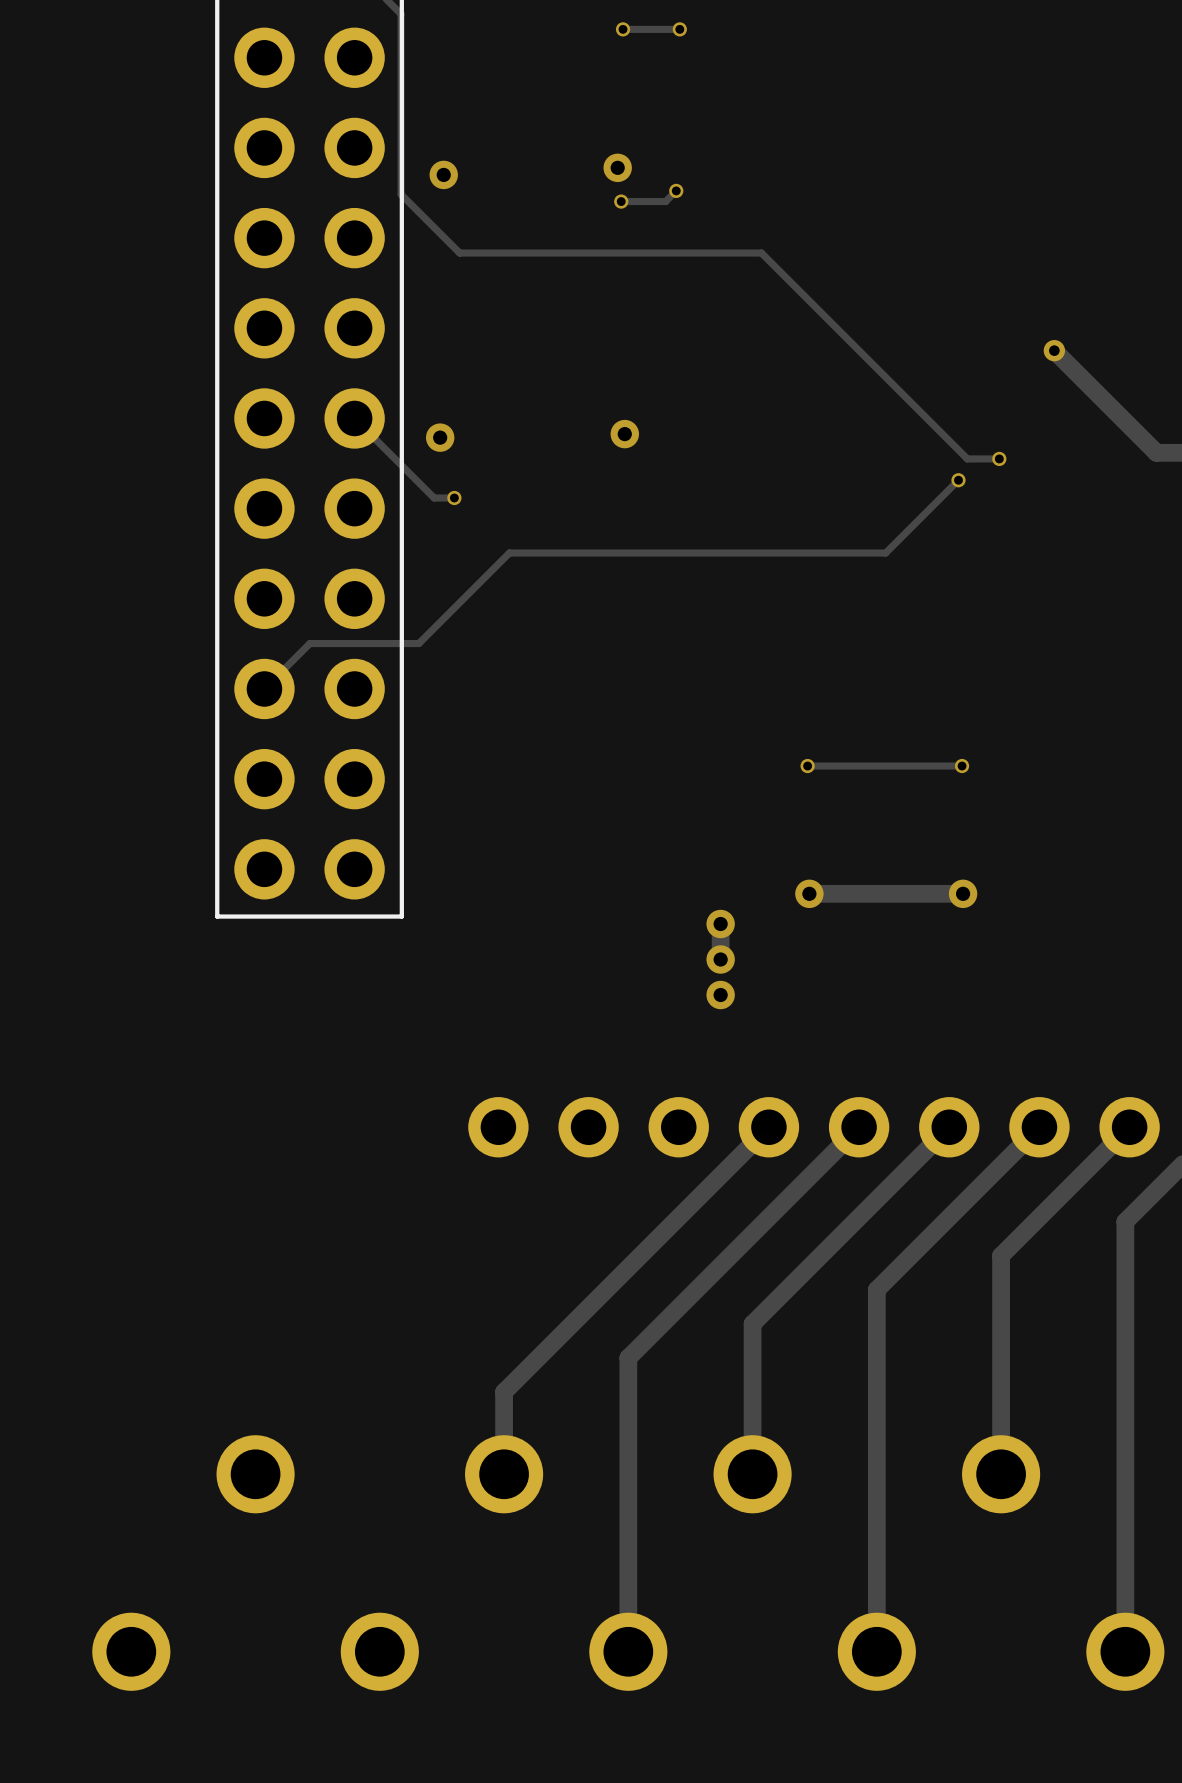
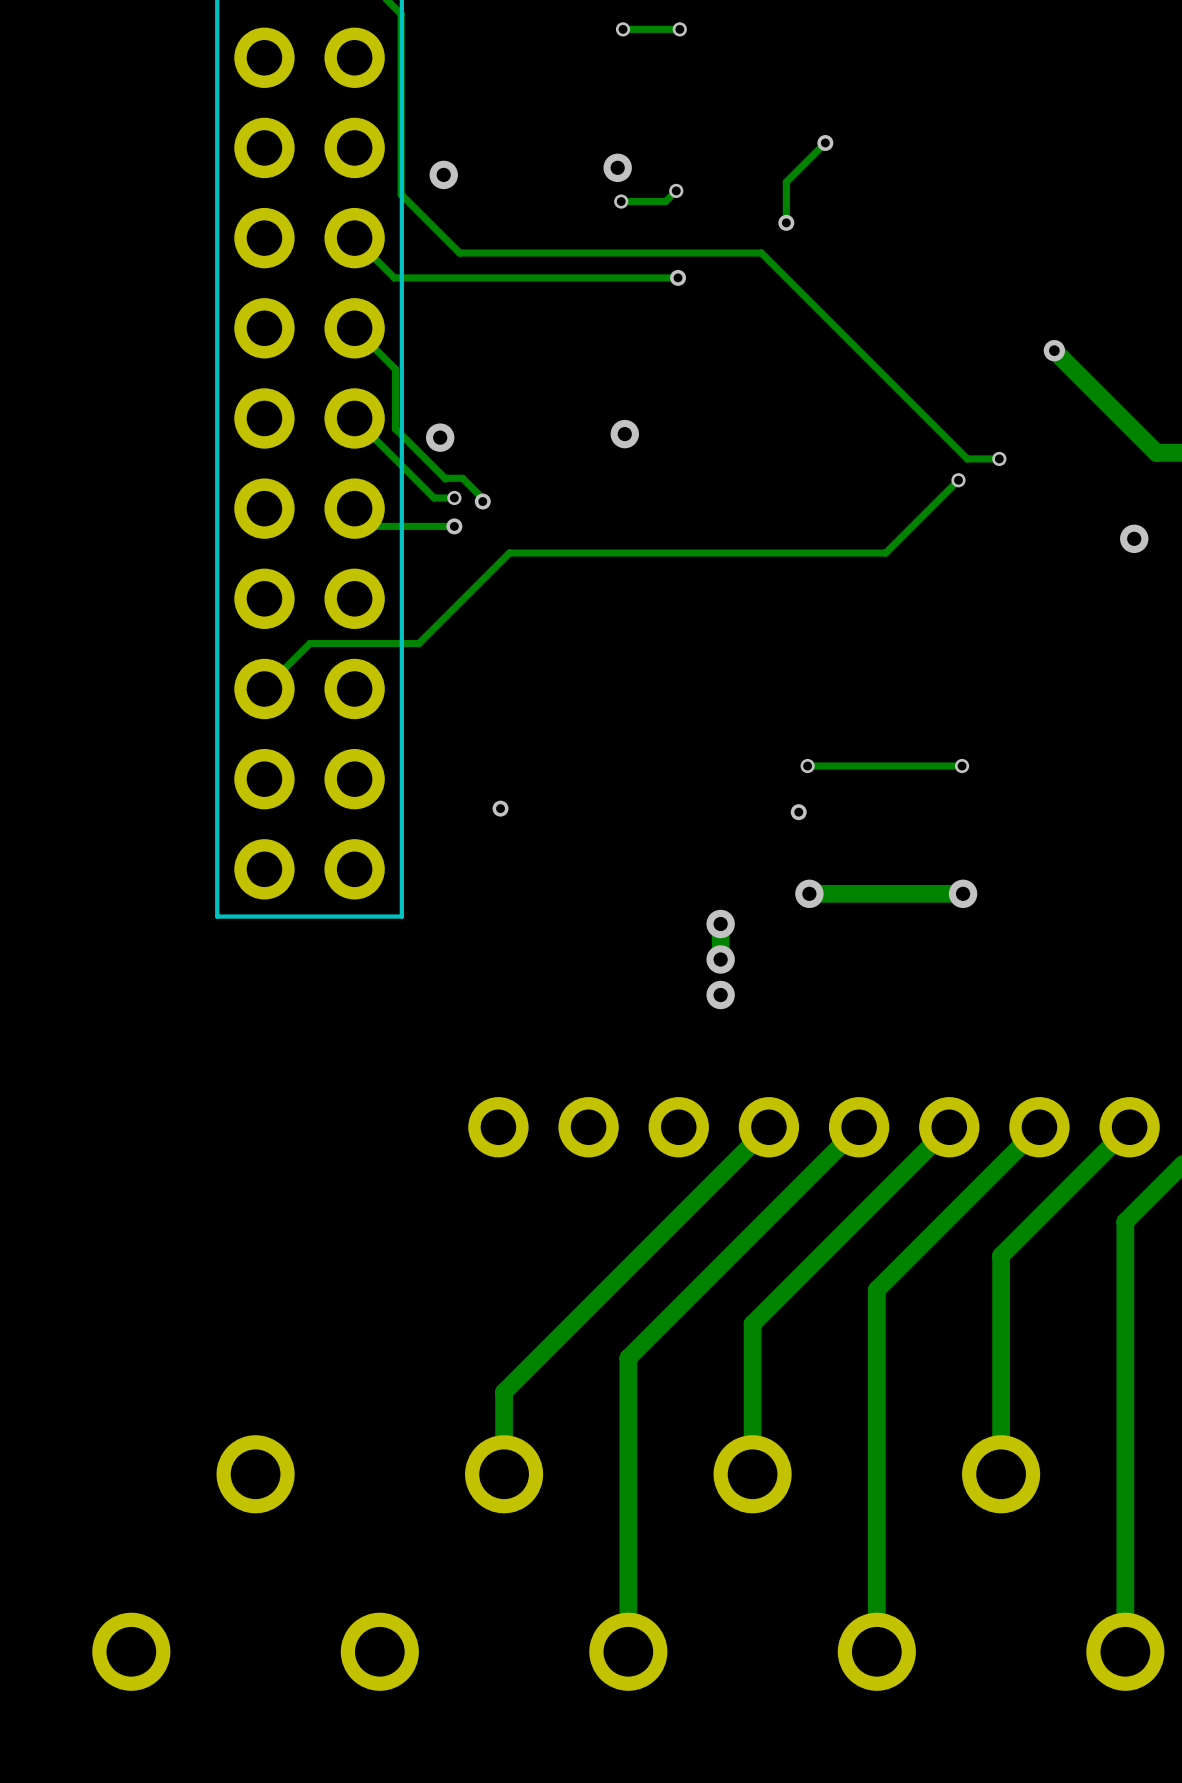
track: none -> (825, 142) (786, 182) (786, 222)
via: none -> (825, 142)
via: none -> (786, 222)
track: none -> (354, 238) (394, 277) (678, 277)
via: none -> (678, 277)
track: none -> (354, 328) (395, 369) (395, 428) (445, 478) (462, 478) (482, 498) (482, 501)
via: none -> (482, 501)
track: none -> (354, 508) (372, 526) (454, 526)
via: none -> (454, 526)
via: none -> (1134, 538)
via: none -> (500, 808)
via: none -> (798, 812)

